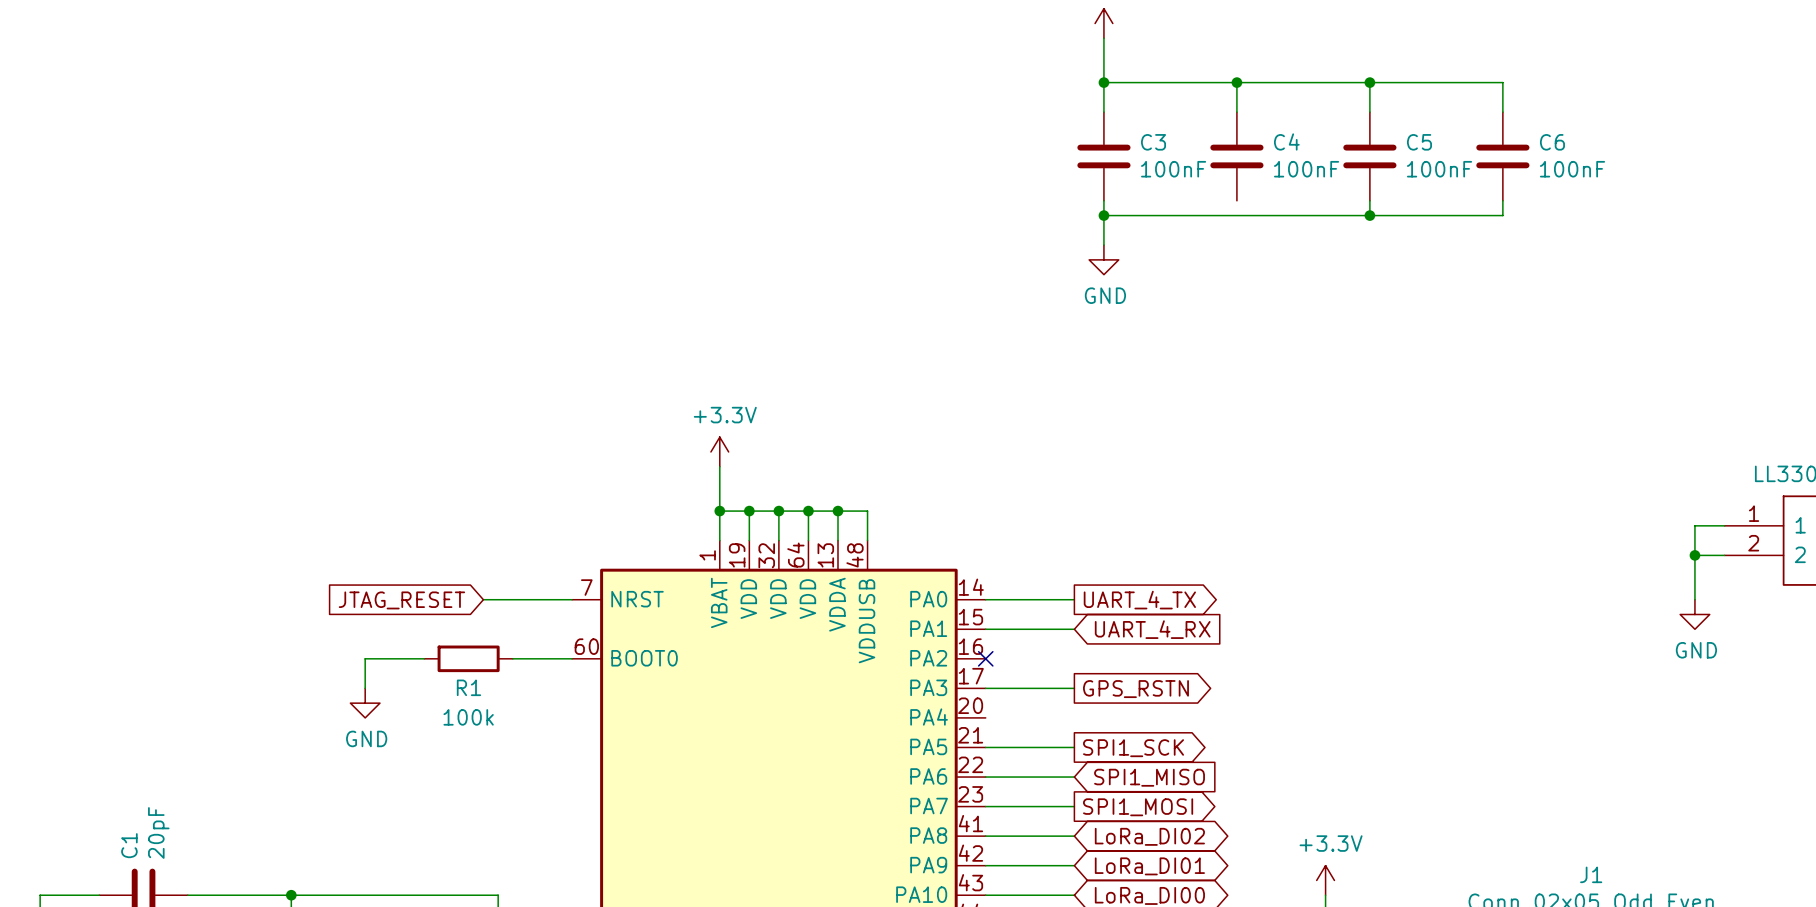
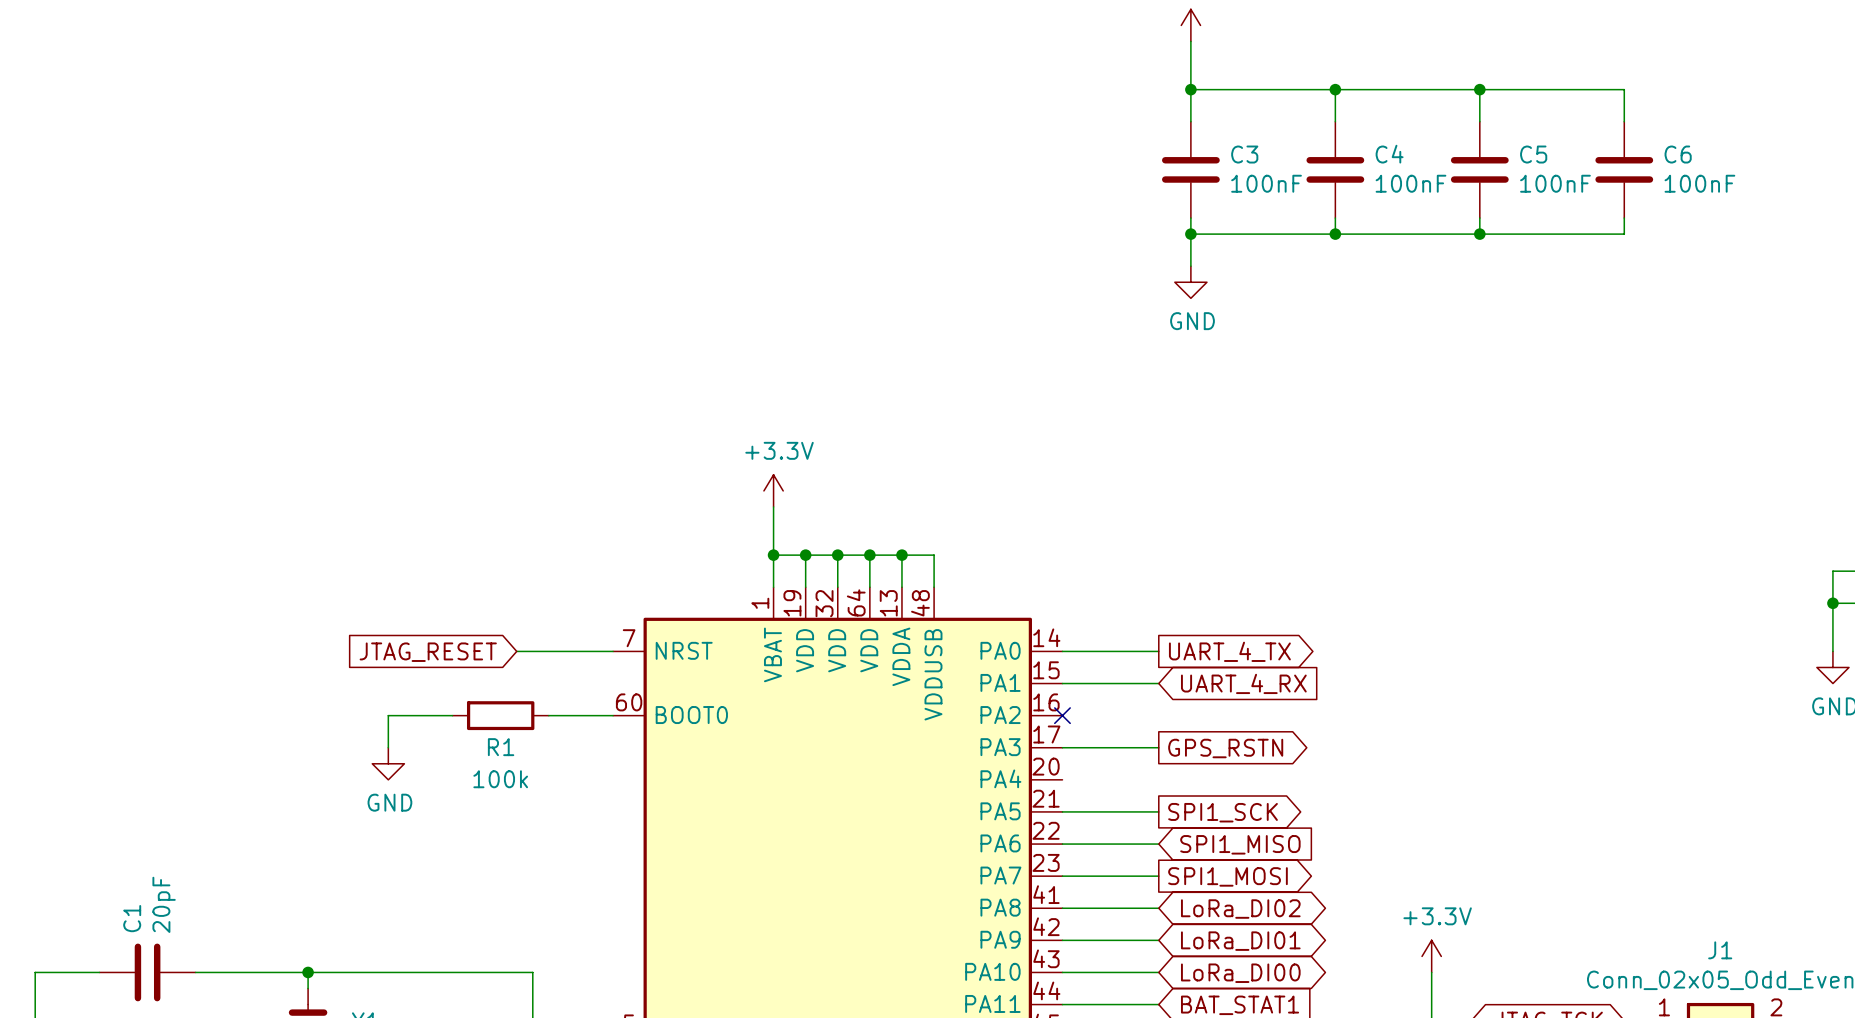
wire: none -> (1335, 218) (1335, 234)
junction: none -> (1335, 234)

